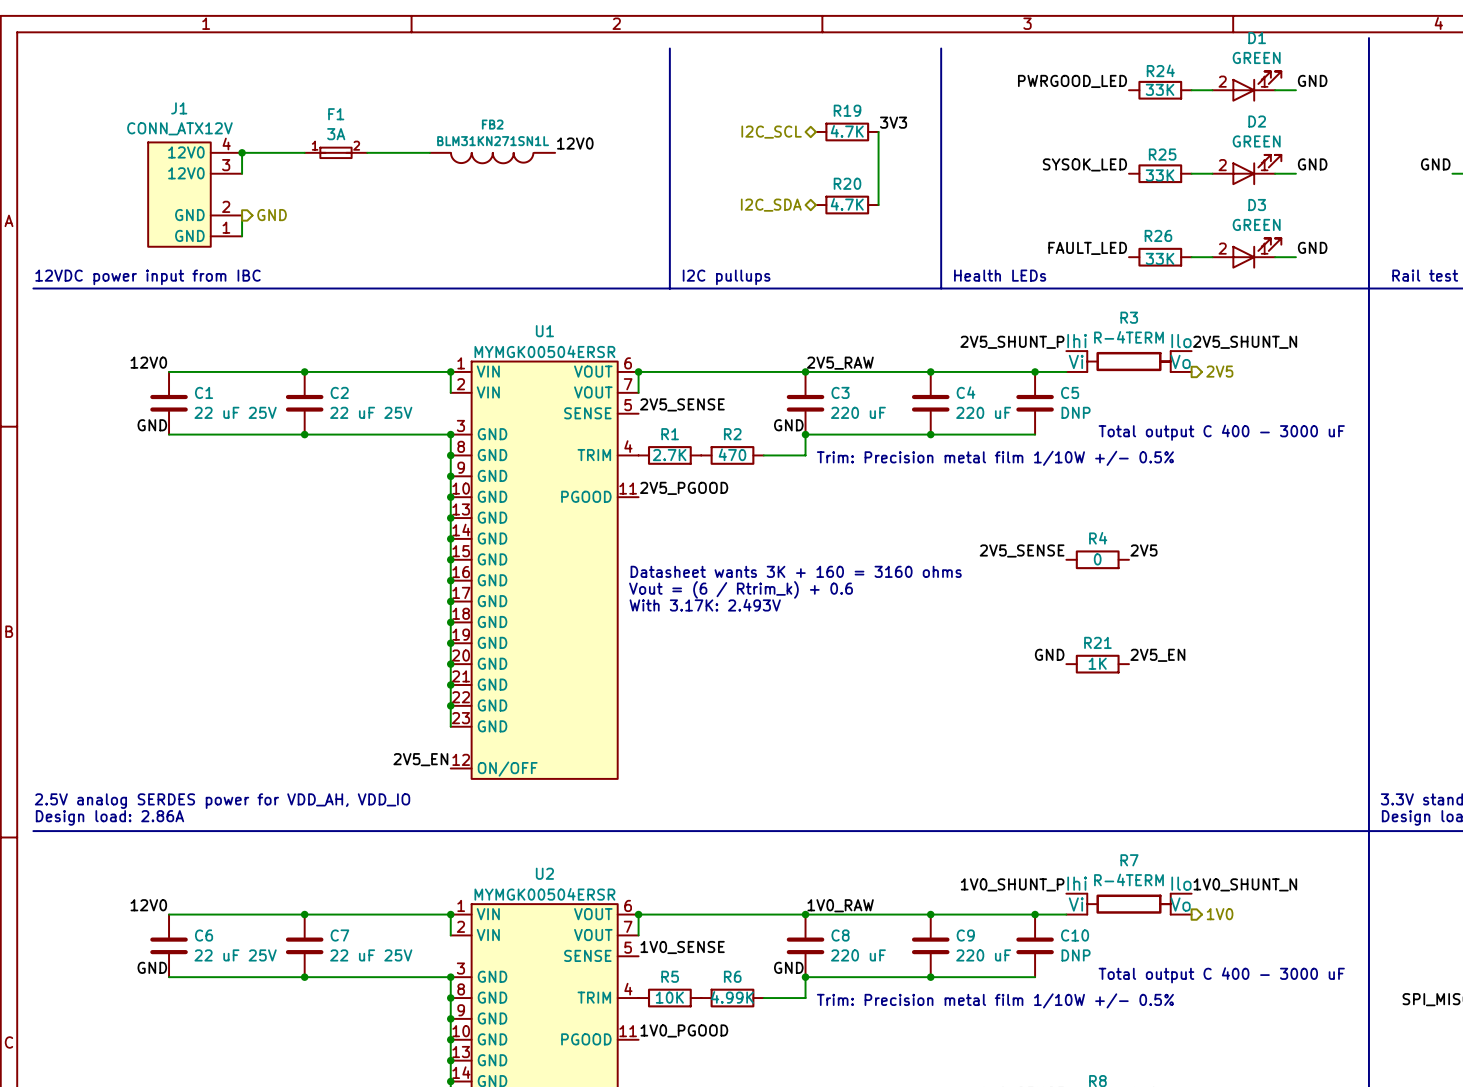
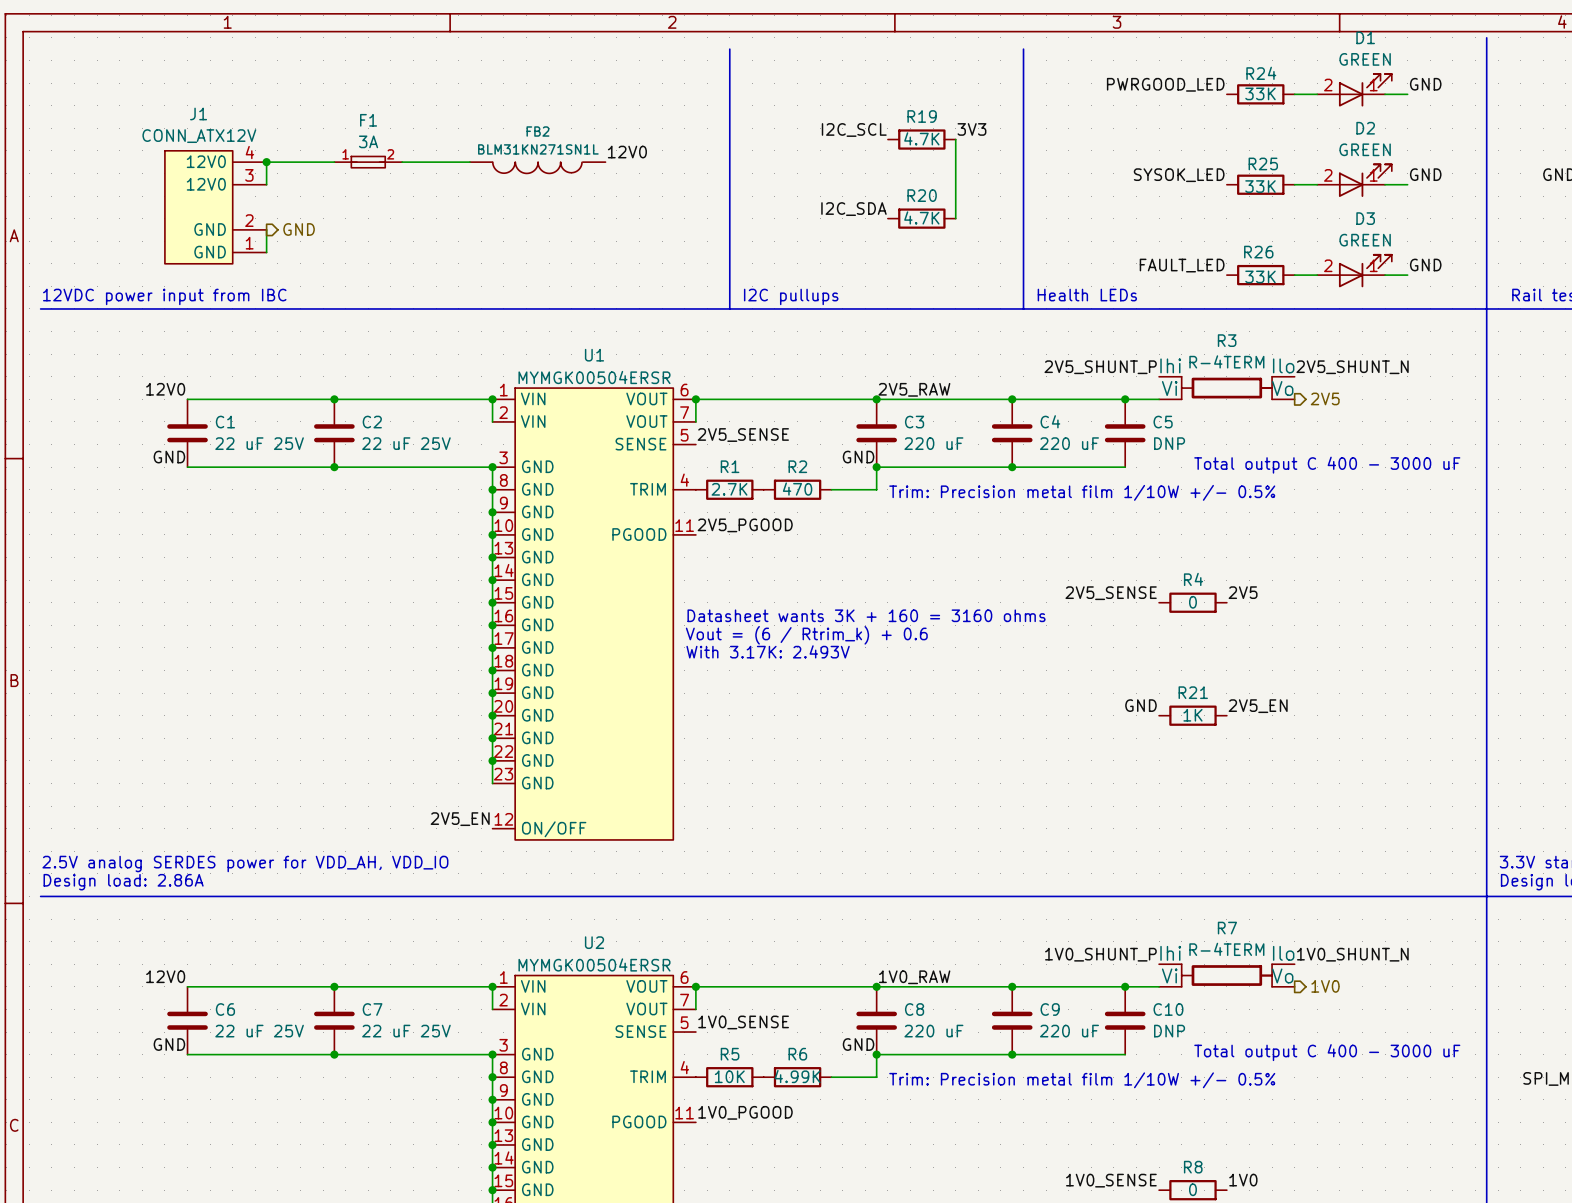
label: none -> I2C_SCL (854, 129)
hierarchical label: I2C_SCL (771, 132) -> none
label: none -> I2C_SDA (853, 209)
hierarchical label: I2C_SDA (771, 205) -> none

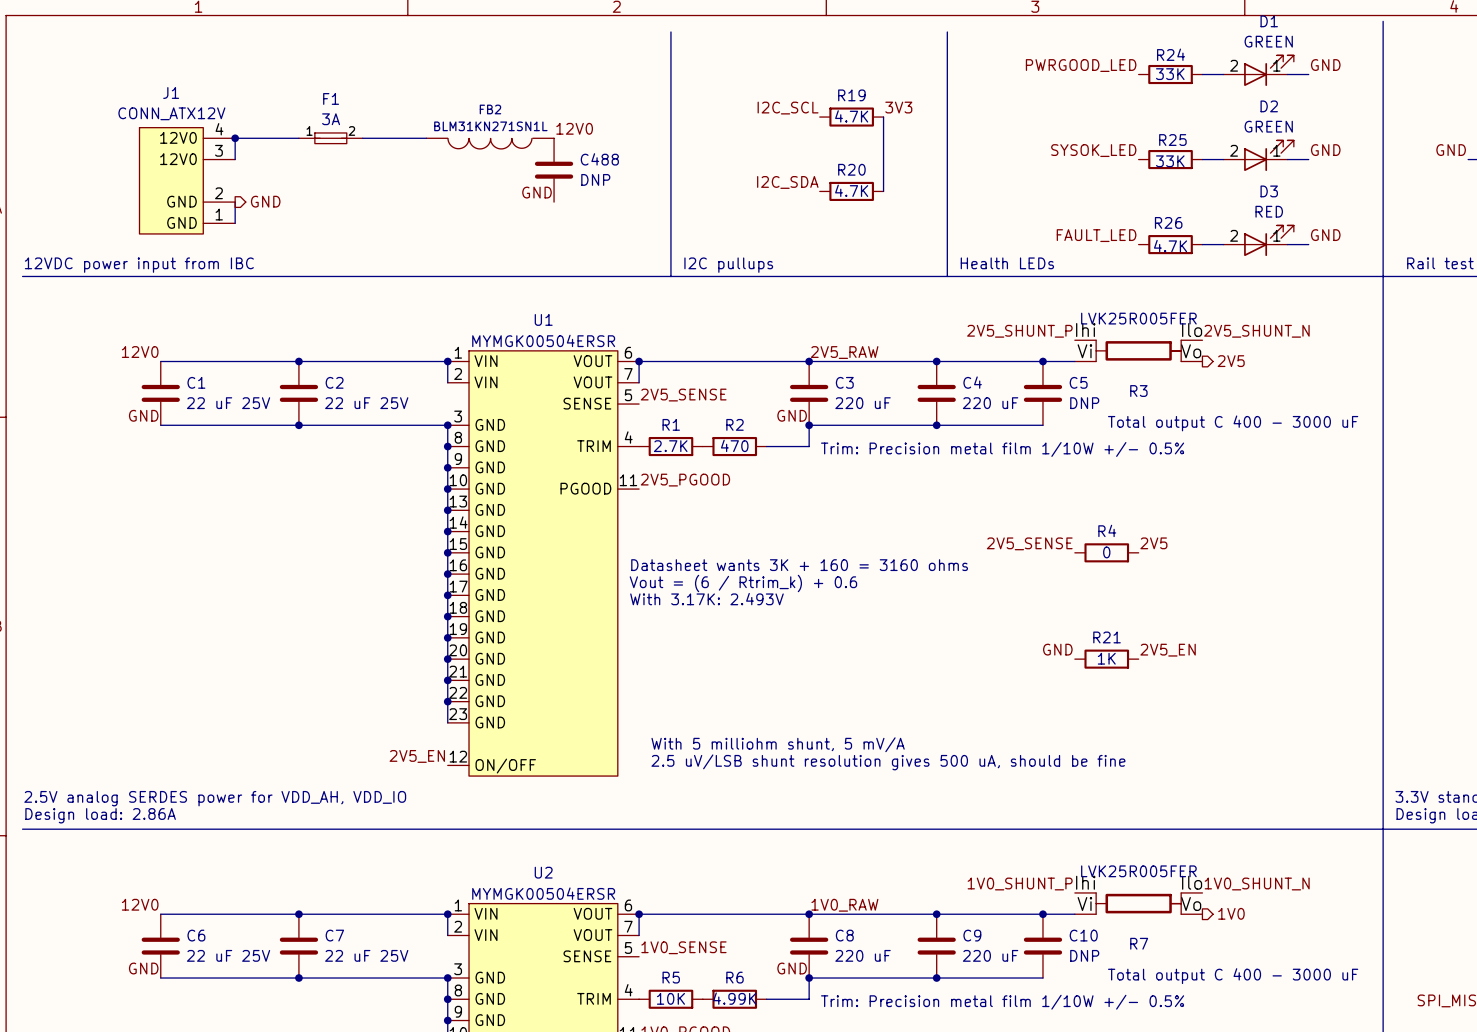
C488: none -> DNP (554, 170)
label: none -> GND (537, 192)
D3 value: GREEN (1365, 240) -> RED (1269, 211)
R26 value: 33K (1260, 276) -> 4.7K (1170, 246)
R3 name position: R3 (1227, 340) -> R3 (1138, 391)
R3 value: R-4TERM (1226, 361) -> LVK25R005FER (1138, 318)
text: none -> With 5 milliohm shunt, 5 mV/A (778, 744)
text: none -> 2.5 uV/LSB shunt resolution gives 500 uA, should be fine (888, 762)
R7 name position: R7 (1227, 928) -> R7 (1139, 943)
R7 value: R-4TERM (1226, 949) -> LVK25R005FER (1138, 871)

